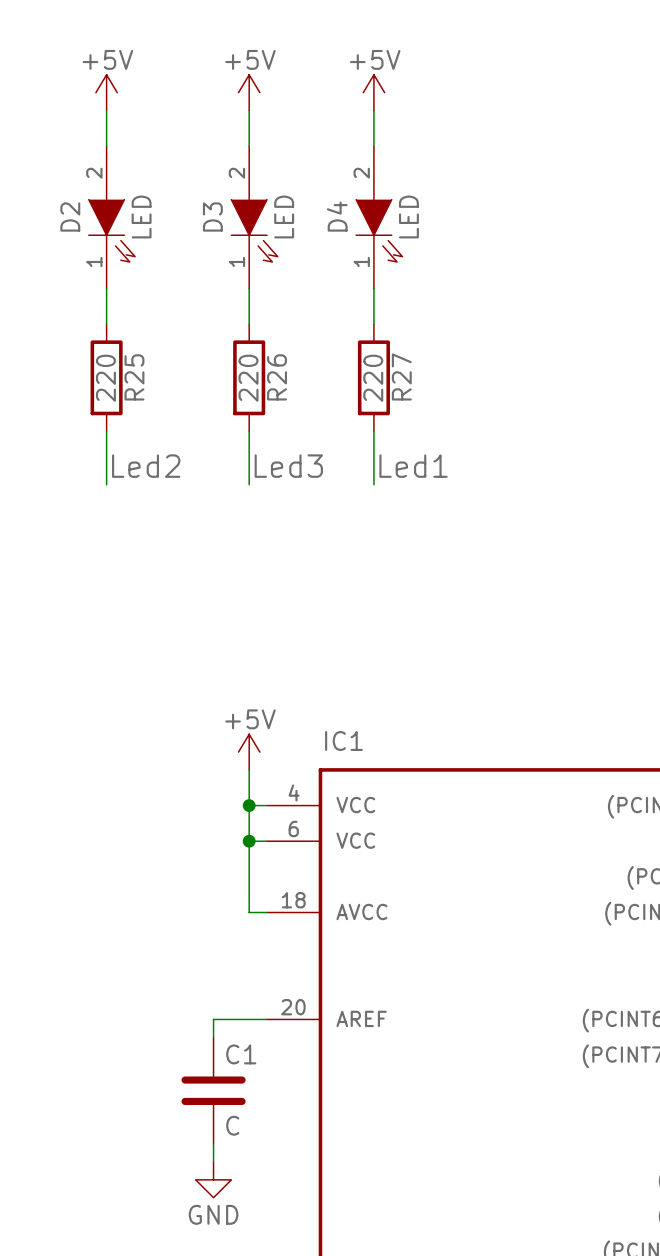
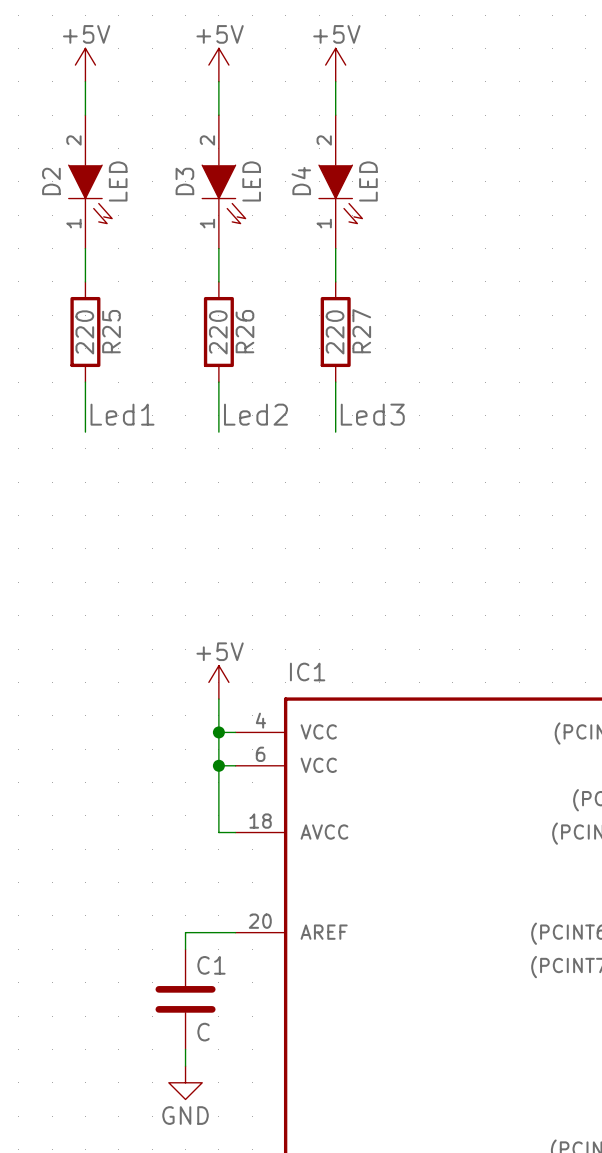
label: Led2 (146, 466) -> Led1 (122, 414)
label: Led3 (288, 466) -> Led2 (255, 414)
label: Led1 (413, 466) -> Led3 (372, 414)

